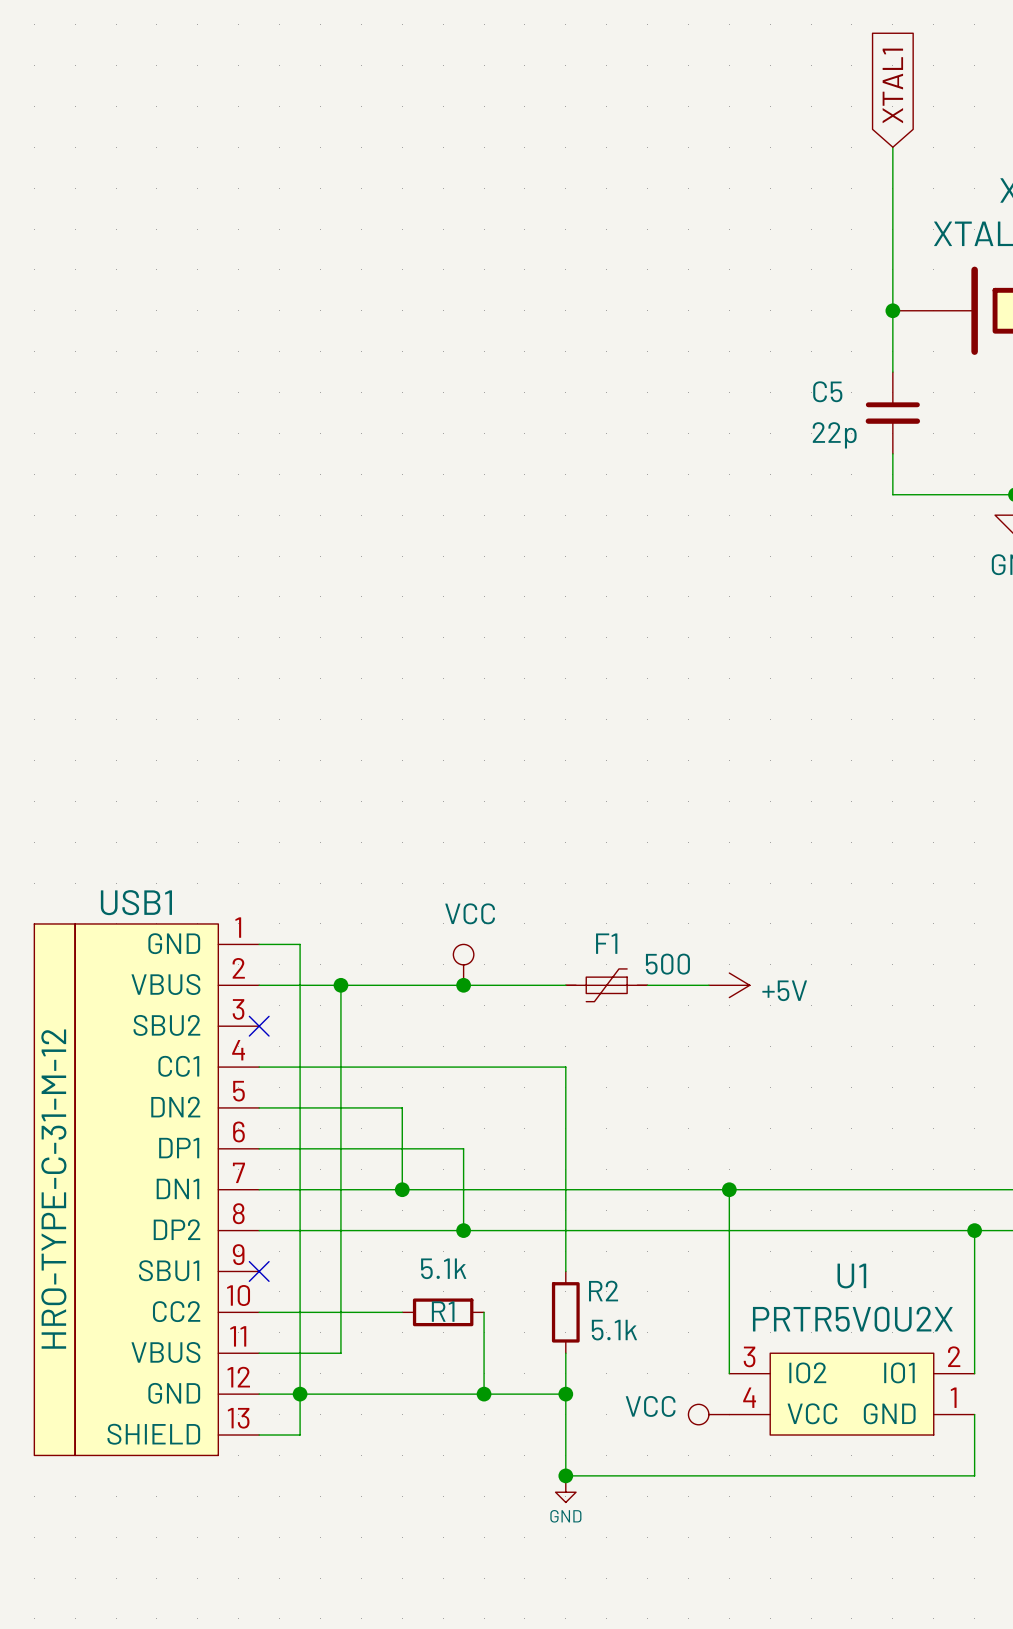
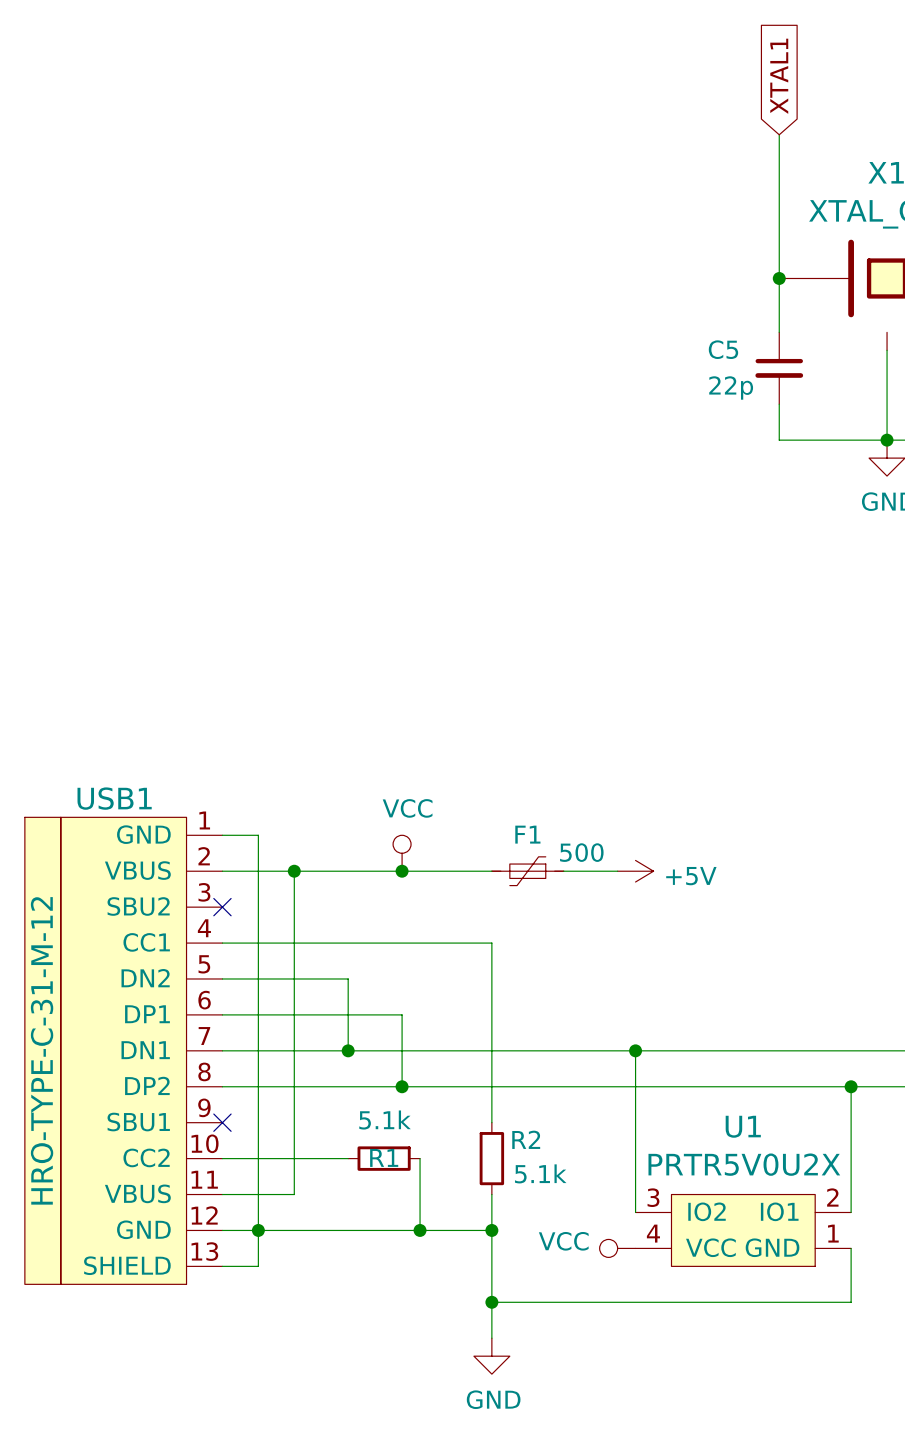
wire: none -> (491, 1302) (491, 1338)
power symbol: GND (565, 1489) -> none
power symbol: none -> GND (491, 1356)

